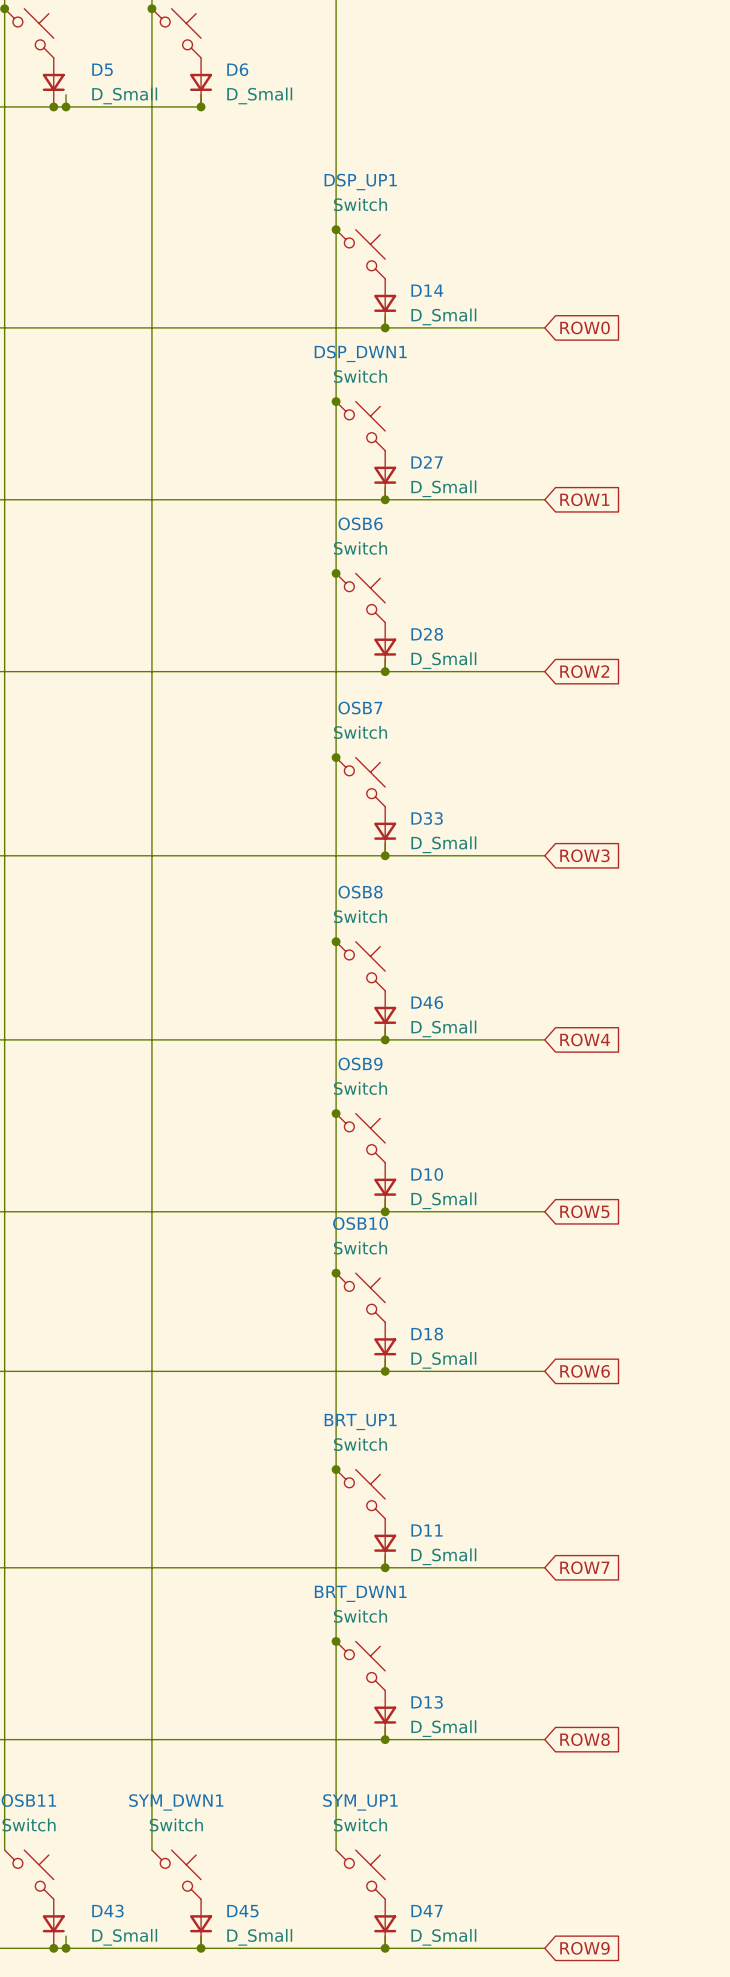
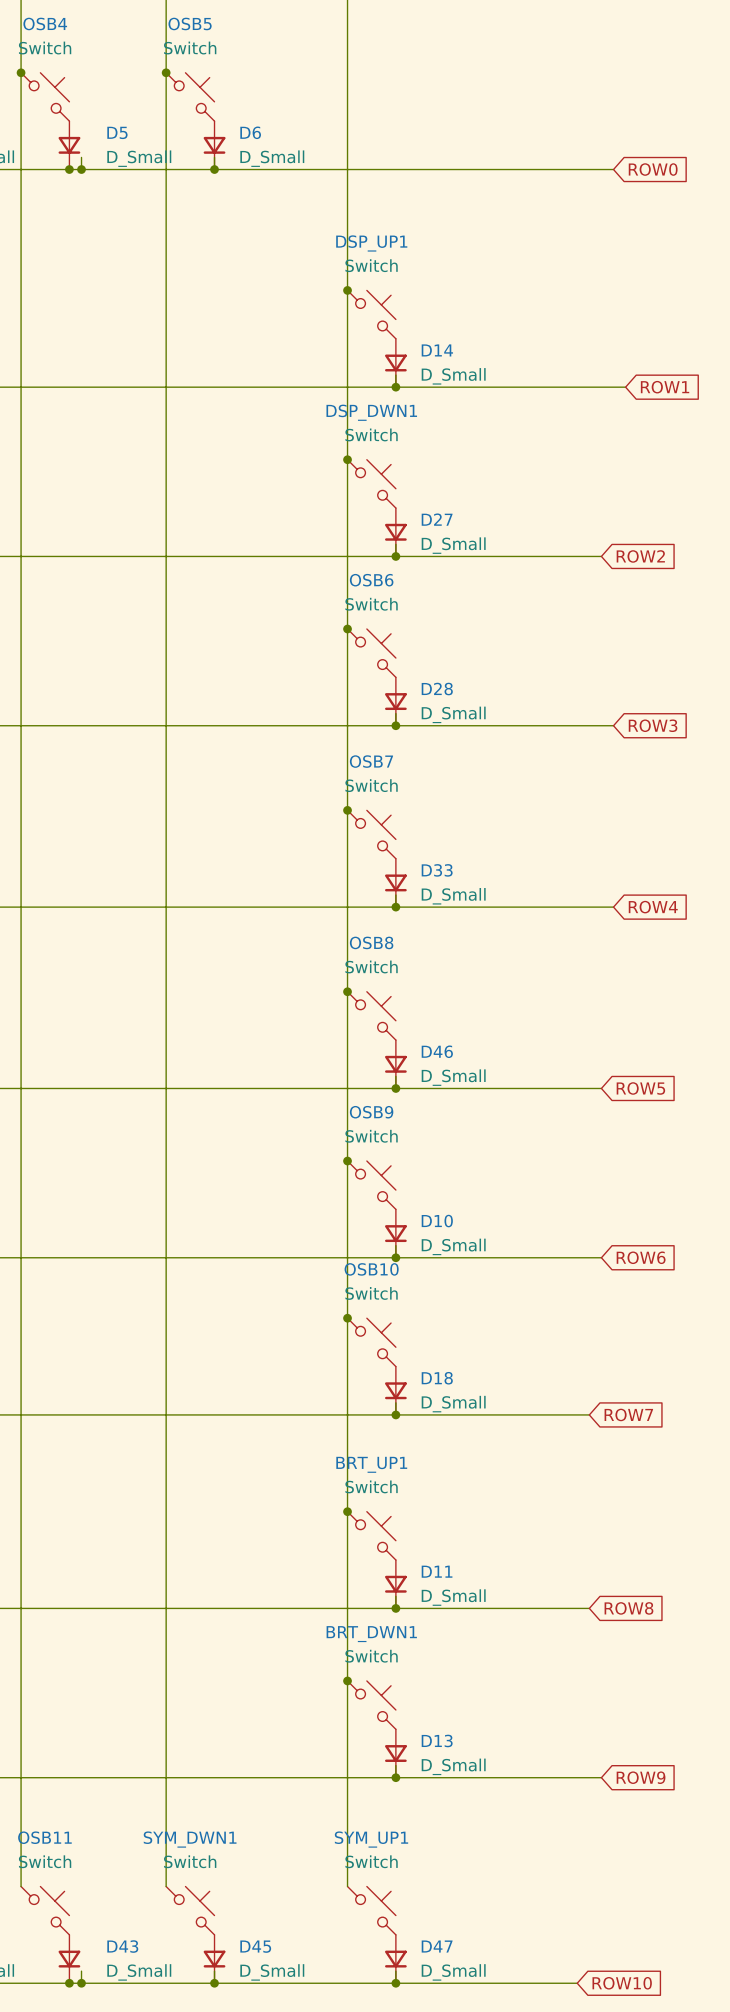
wire: none -> (214, 169) (613, 169)
wire: none -> (553, 387) (625, 387)
global label position: ROW0 (585, 327) -> ROW0 (653, 169)
wire: none -> (553, 556) (601, 556)
global label position: ROW1 (584, 499) -> ROW1 (665, 387)
wire: none -> (553, 725) (613, 725)
global label position: ROW2 (584, 671) -> ROW2 (640, 556)
wire: none -> (553, 907) (613, 907)
global label position: ROW3 (584, 855) -> ROW3 (653, 725)
wire: none -> (553, 1088) (601, 1088)
global label position: ROW4 (585, 1039) -> ROW4 (653, 907)
wire: none -> (553, 1257) (601, 1257)
global label position: ROW5 (584, 1211) -> ROW5 (640, 1088)
wire: none -> (553, 1414) (589, 1414)
global label position: ROW6 (585, 1371) -> ROW6 (641, 1257)
wire: none -> (553, 1608) (589, 1608)
global label position: ROW7 (584, 1567) -> ROW7 (628, 1414)
wire: none -> (553, 1777) (601, 1777)
global label position: ROW8 (585, 1739) -> ROW8 (628, 1608)
wire: none -> (553, 1983) (577, 1983)
global label position: ROW9 (584, 1948) -> ROW9 (641, 1777)
global label: none -> ROW10 (622, 1983)

